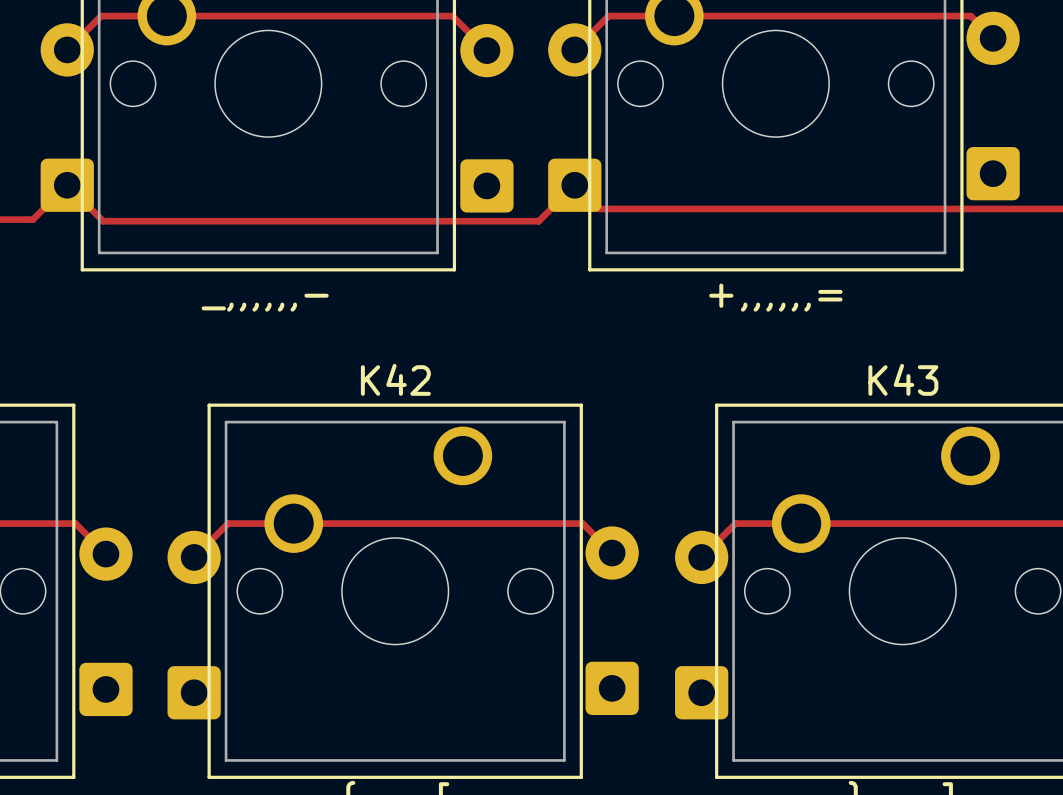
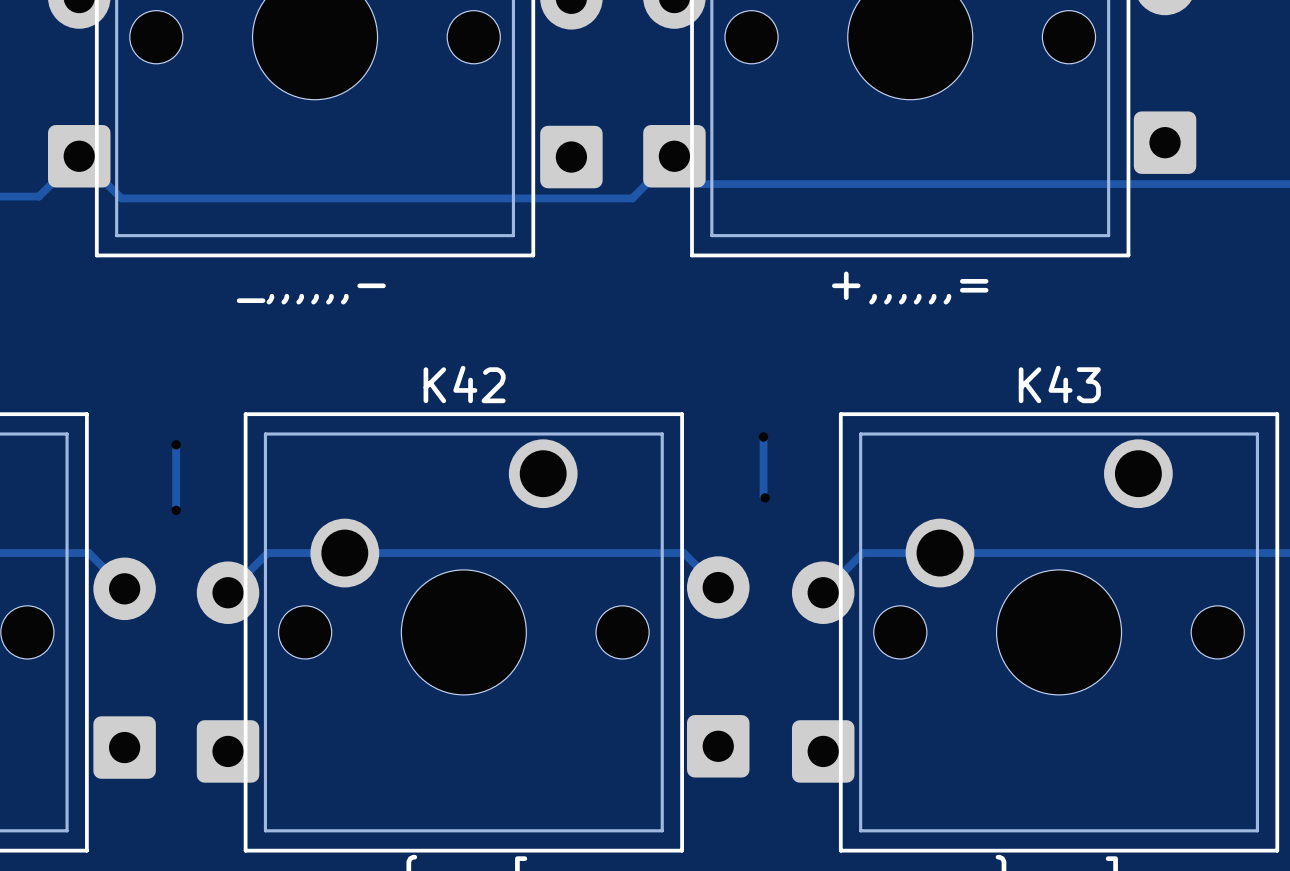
track: none -> (763, 436) (763, 496) (765, 497)
via: none -> (763, 436)
track: none -> (176, 444) (176, 510)
via: none -> (176, 444)
via: none -> (765, 497)
via: none -> (176, 510)

